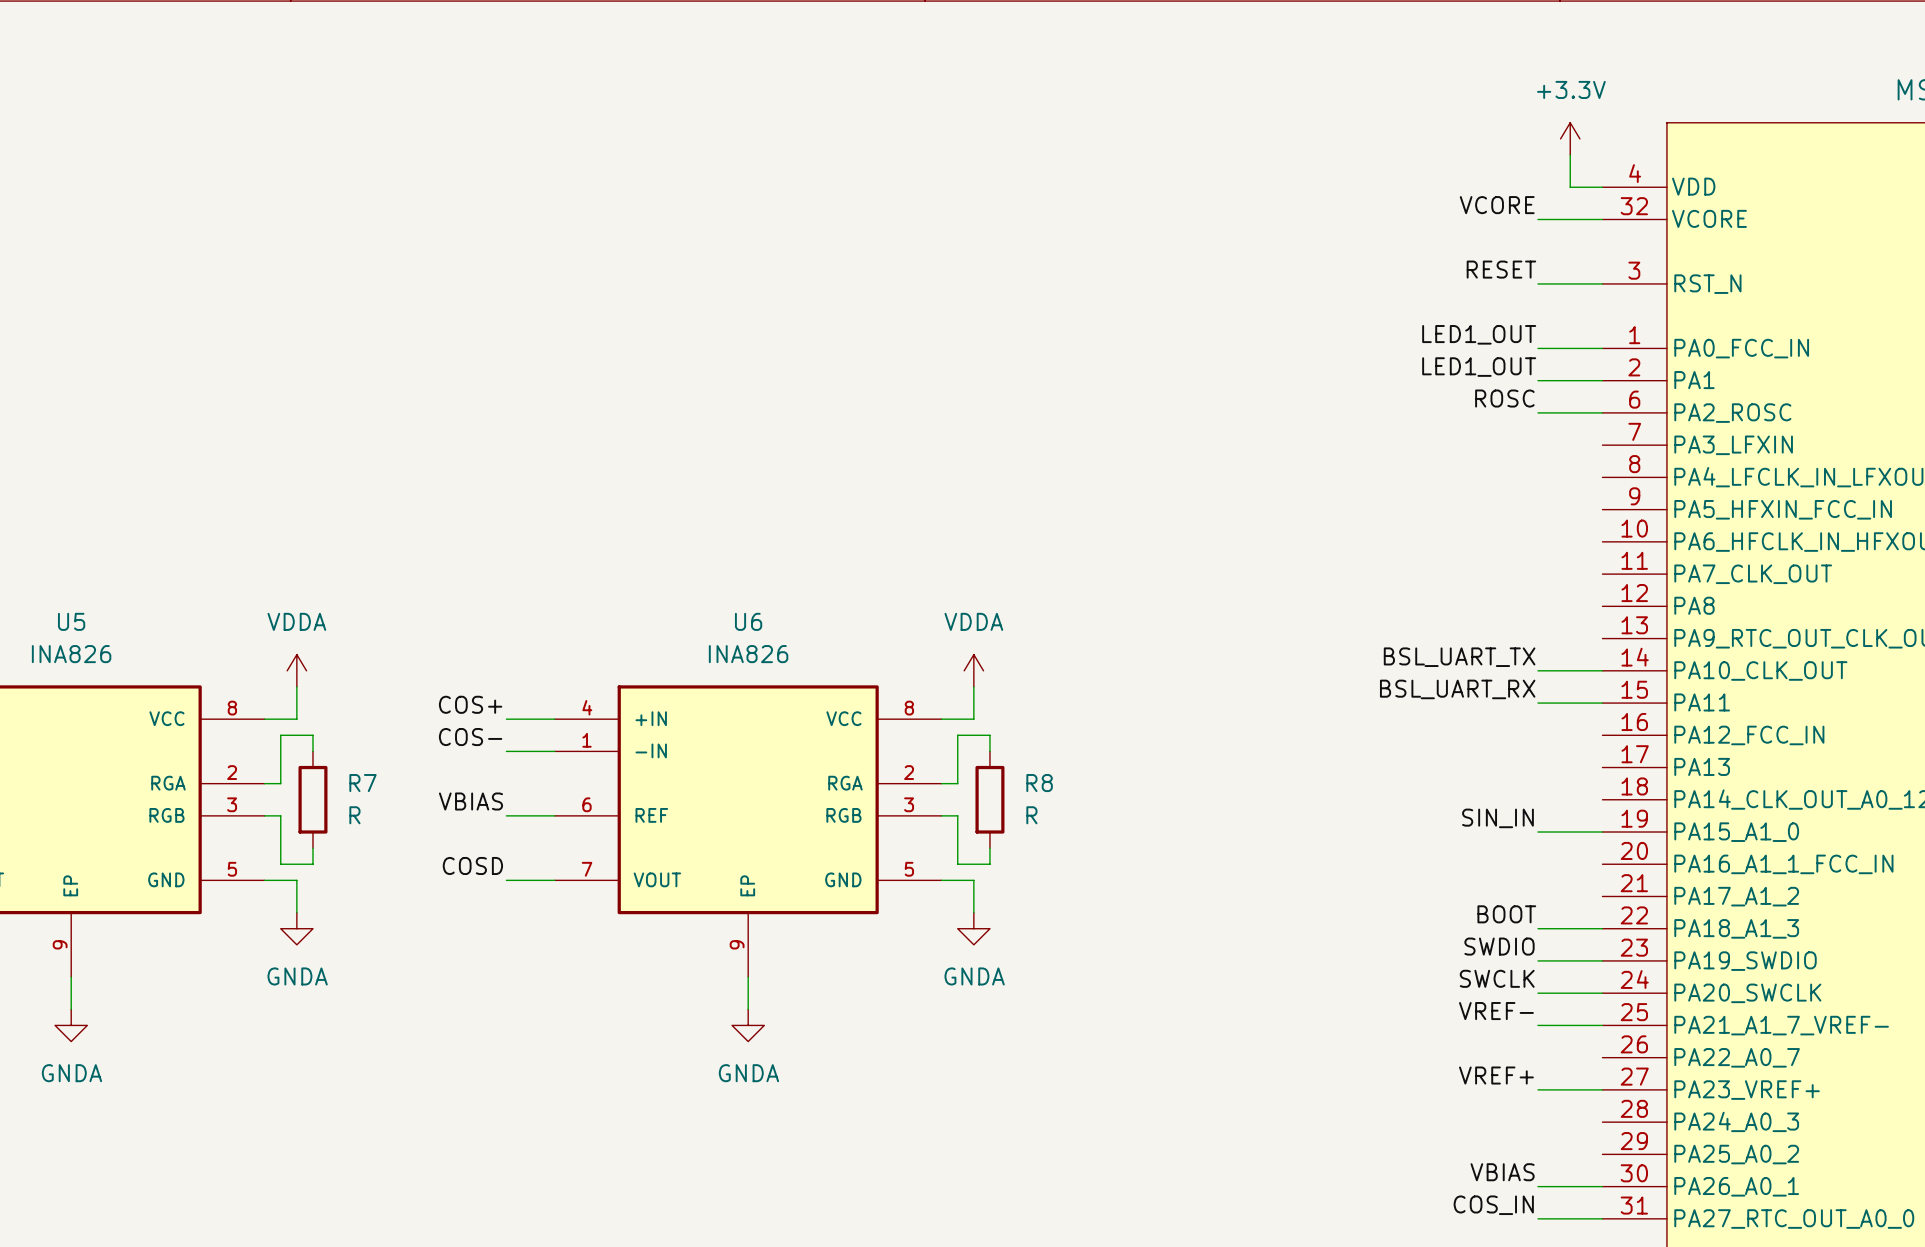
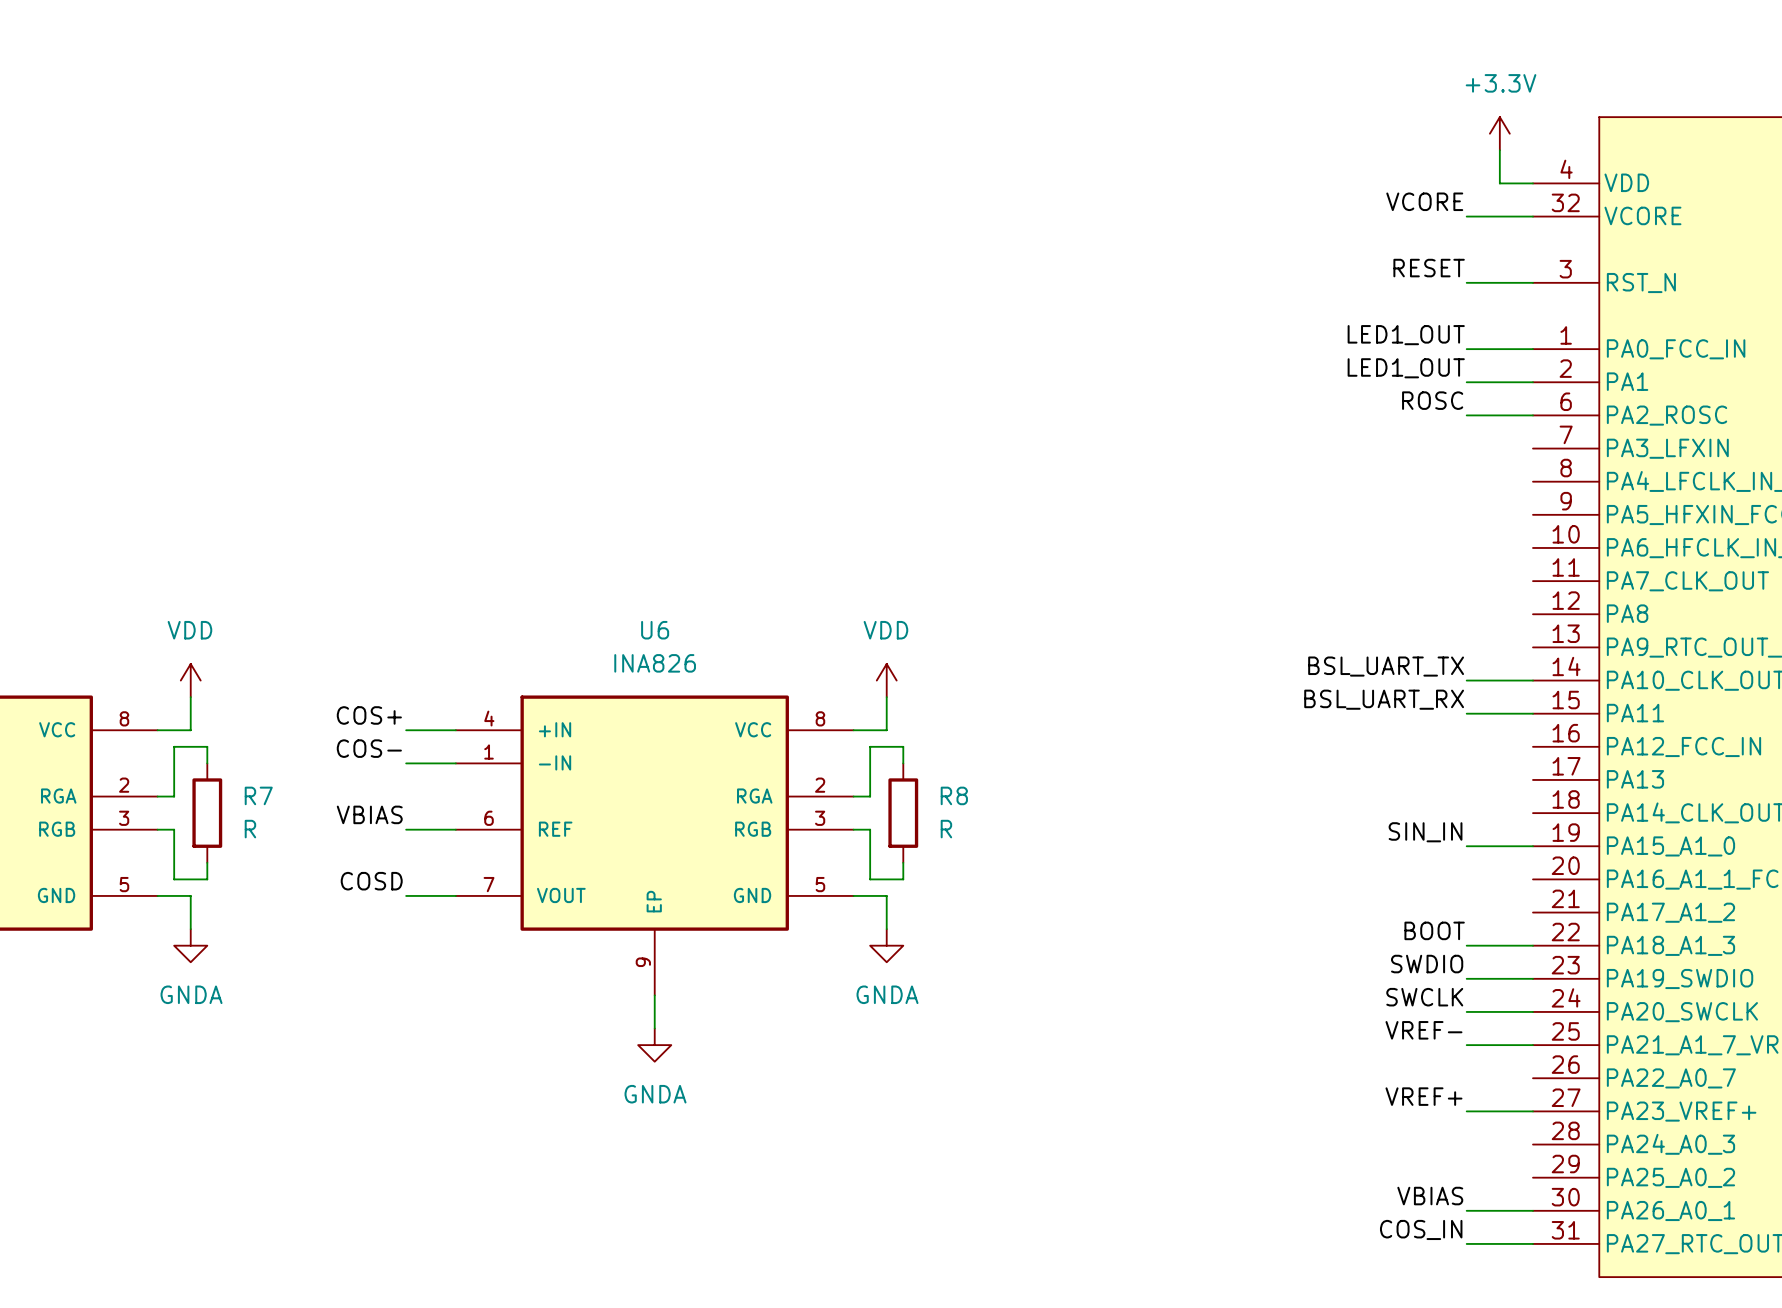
power symbol: VDDA (296, 670) -> VDD (190, 680)
power symbol: VDDA (973, 670) -> VDD (886, 680)

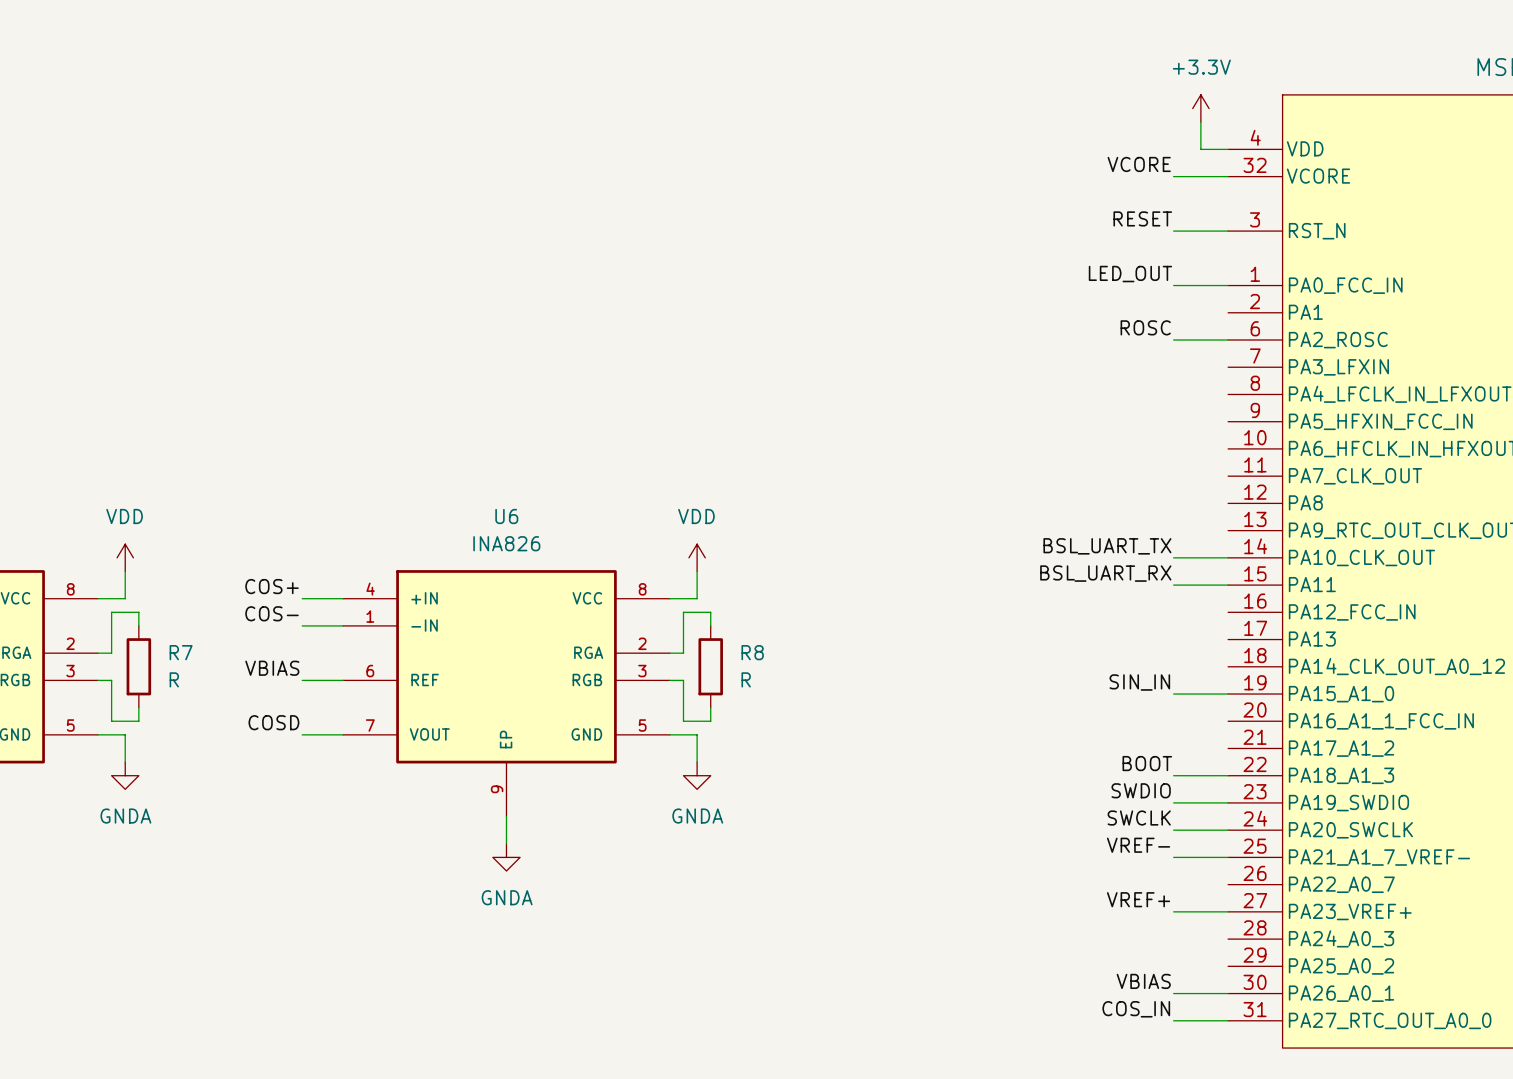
label: LED1_OUT (1406, 335) -> LED_OUT (1130, 274)
label: LED1_OUT (1406, 368) -> none
wire: (1466, 382) (1532, 382) -> none

